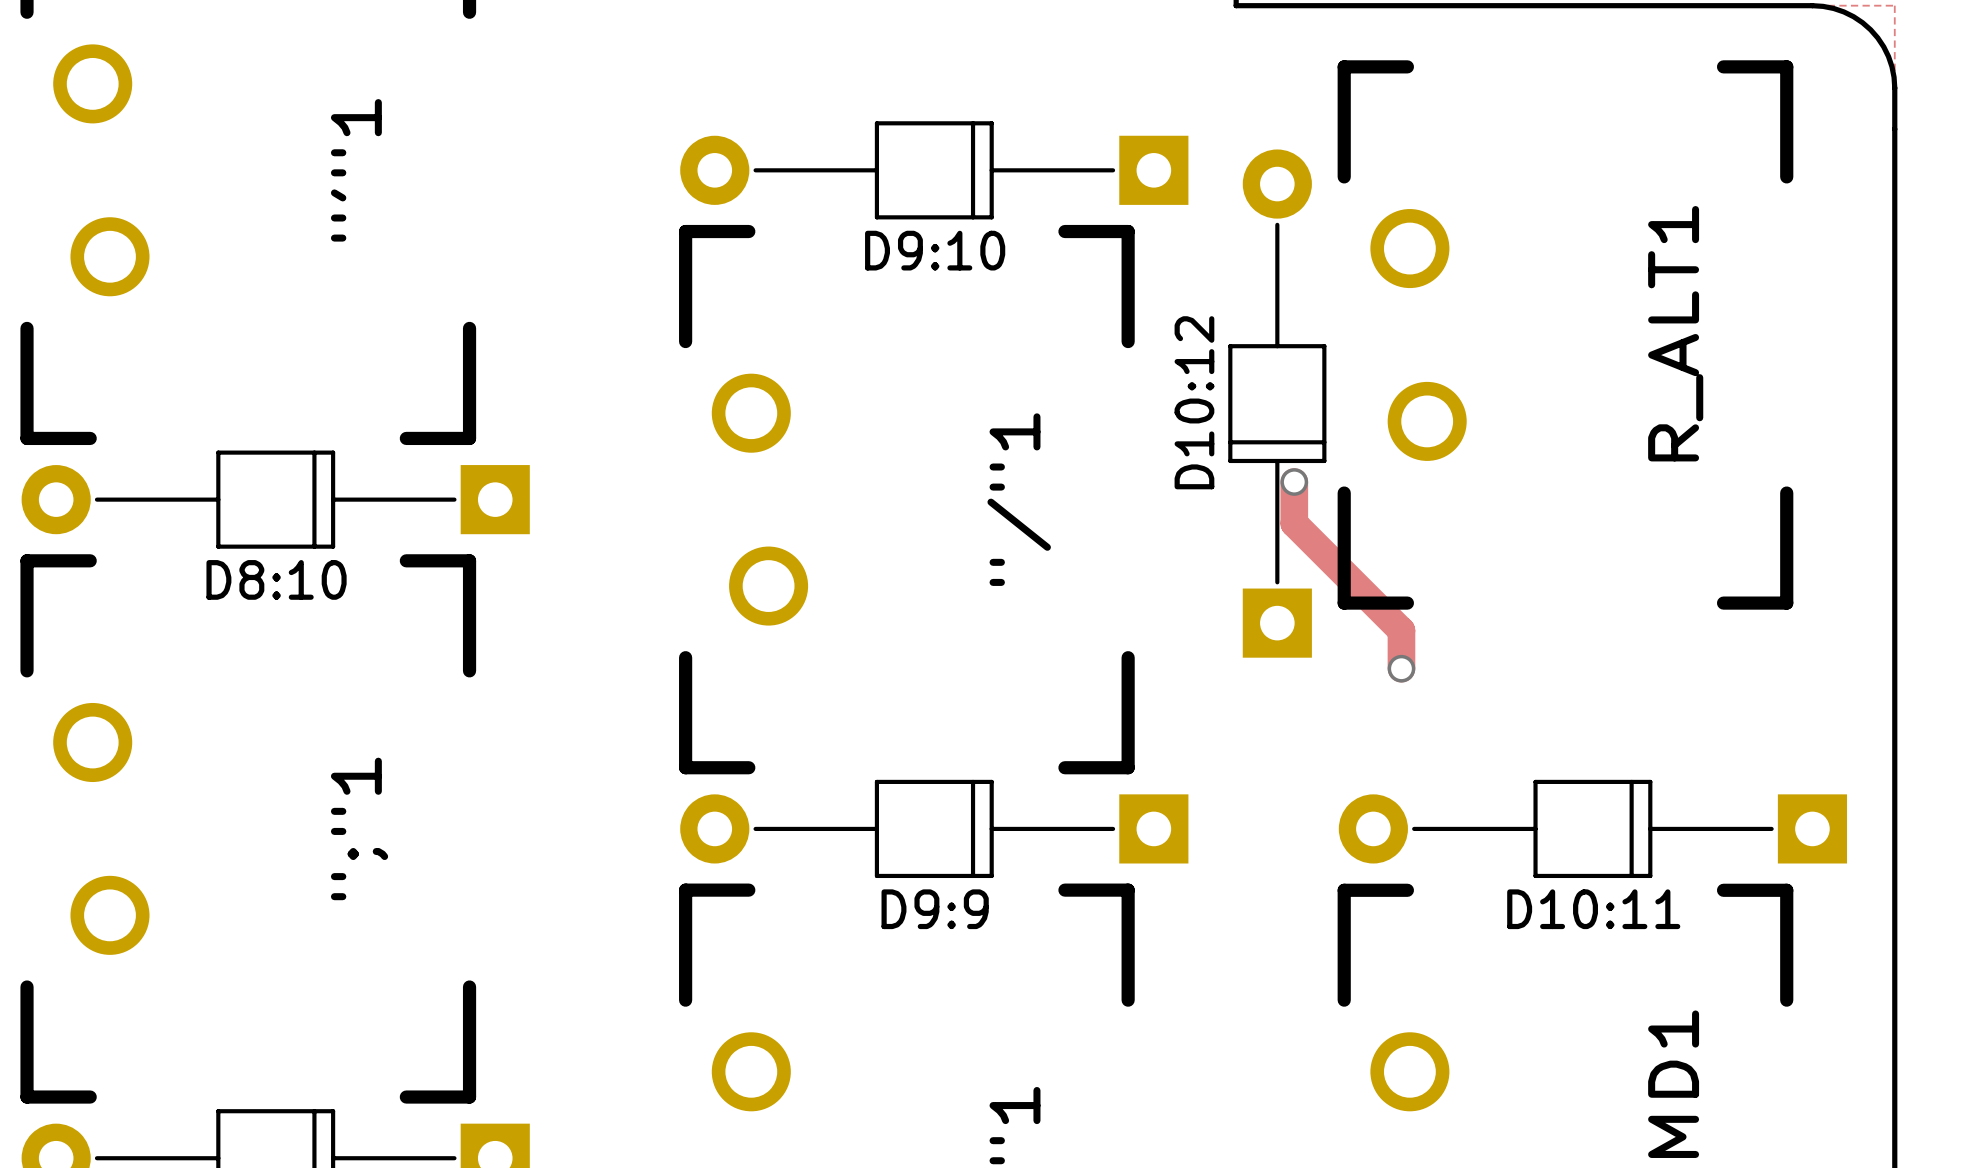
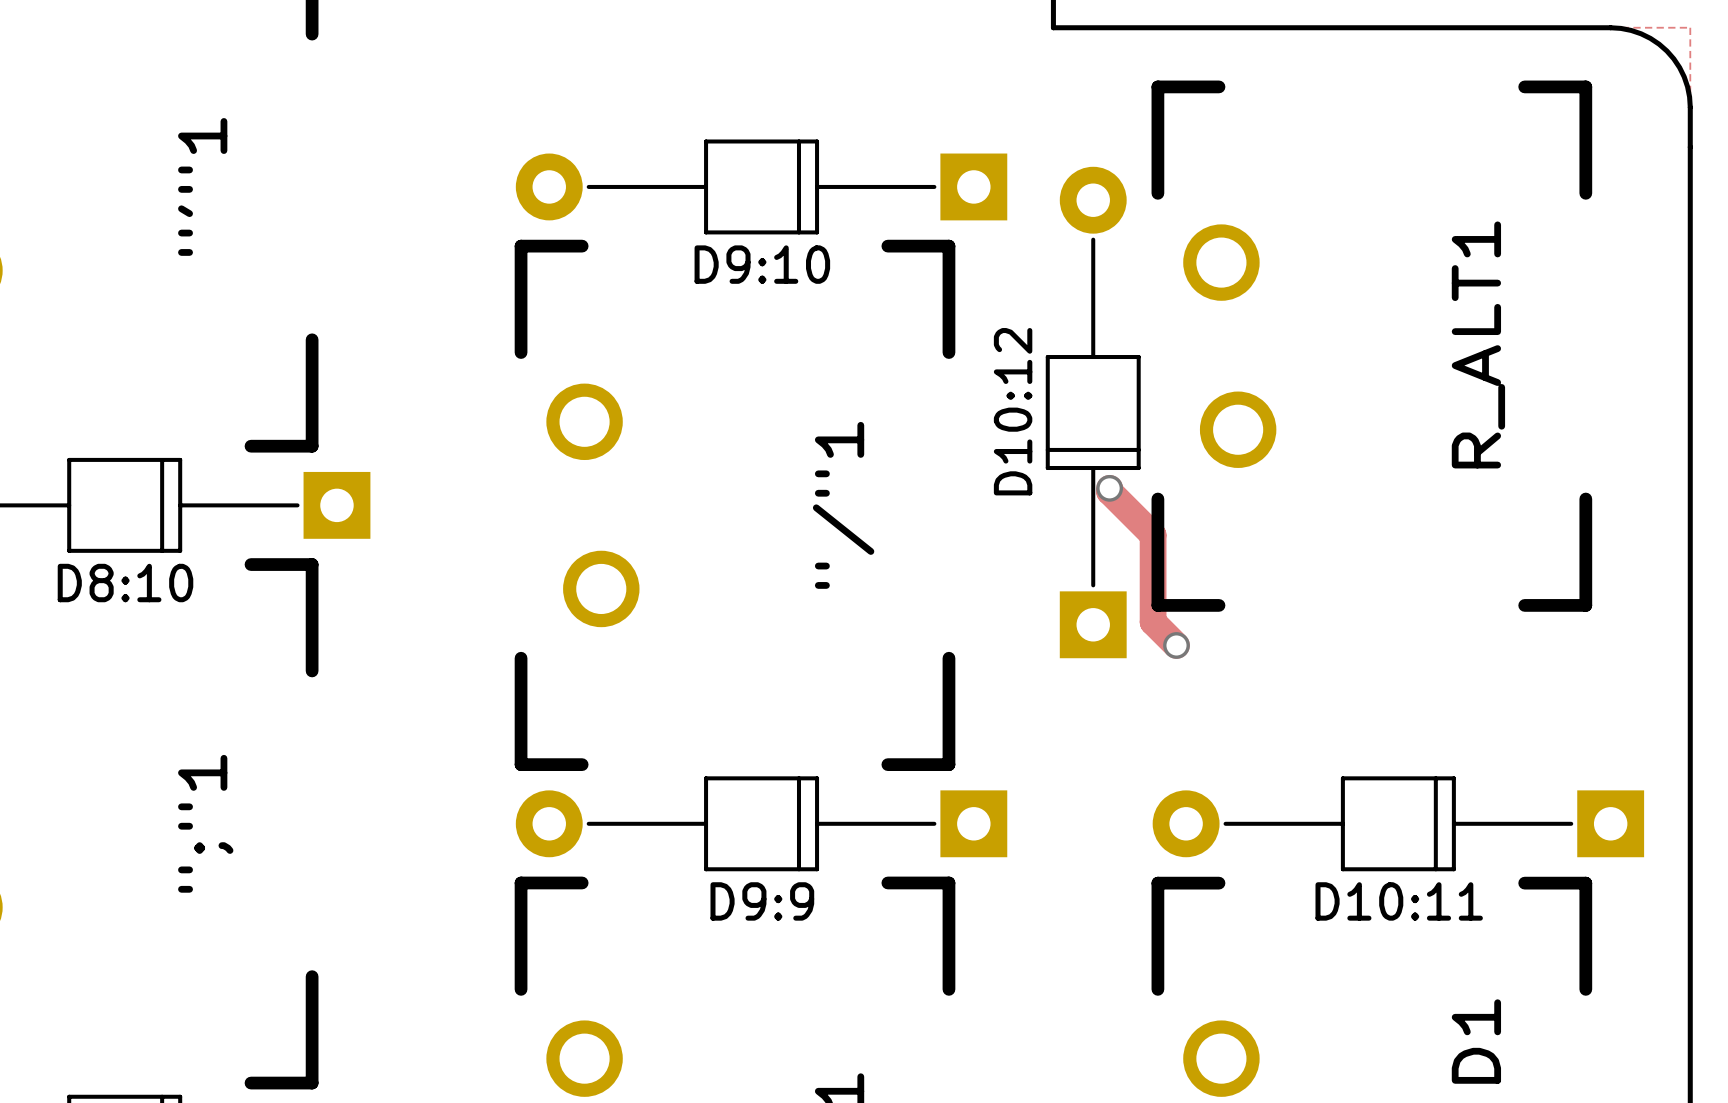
track: (1294, 485) (1294, 523) (1401, 630) (1401, 668) -> (1109, 491) (1153, 535) (1153, 622) (1176, 645)
via position: (1401, 668) -> (1176, 645)

